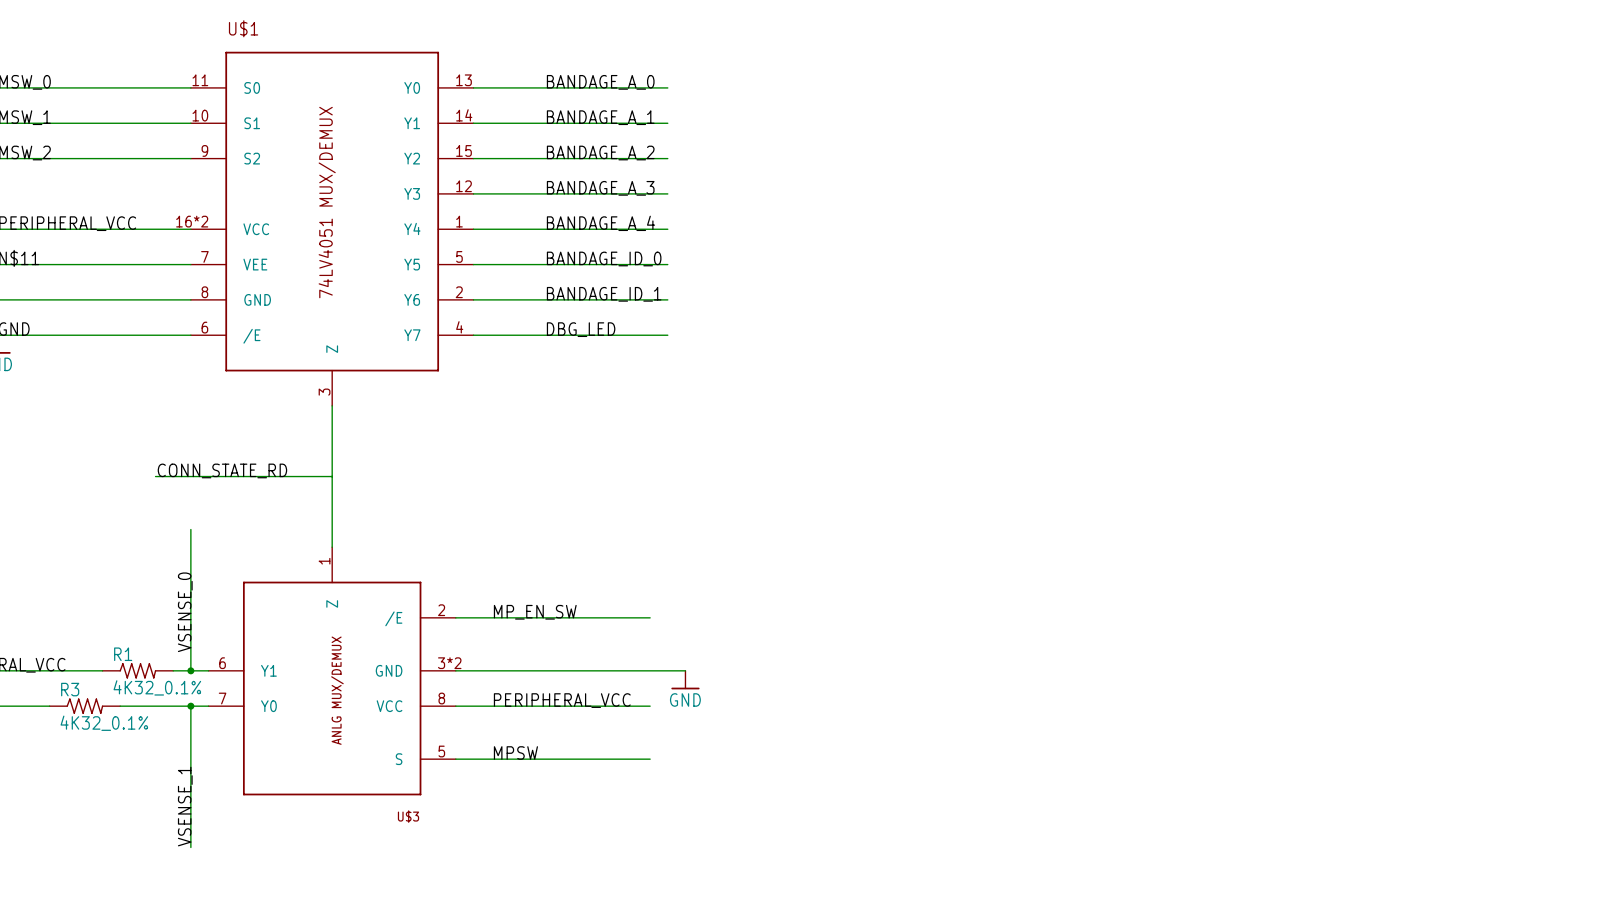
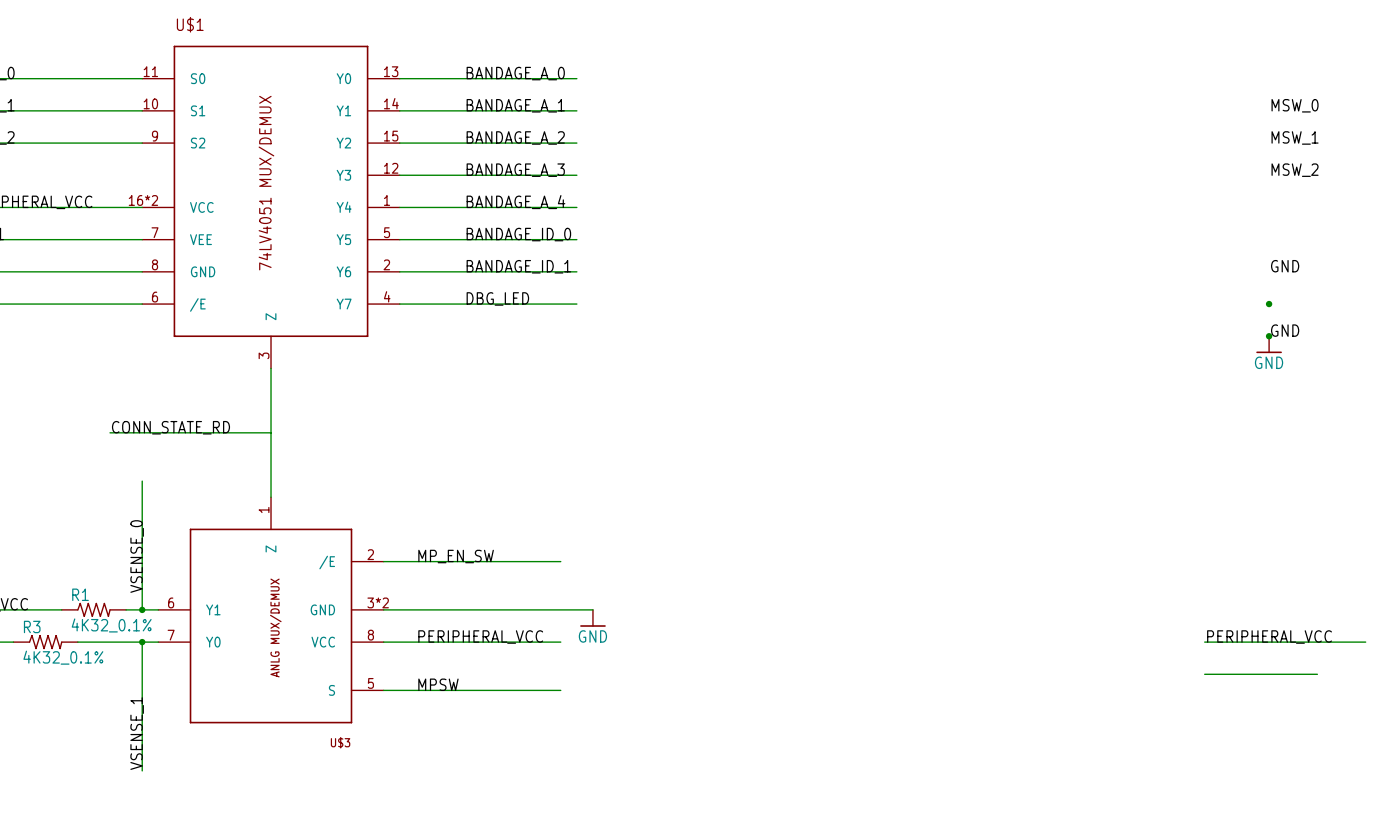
label: none -> MSW_0 (1295, 105)
label: none -> MSW_1 (1295, 137)
label: none -> MSW_2 (1295, 170)
label: none -> GND (1285, 266)
junction: none -> (1269, 304)
label: none -> GND (1285, 330)
junction: none -> (1269, 336)
power symbol: none -> GND (1269, 344)
label: none -> PERIPHERAL_VCC (1269, 637)
wire: none -> (1204, 642) (1365, 642)
wire: none -> (1204, 674) (1317, 674)

